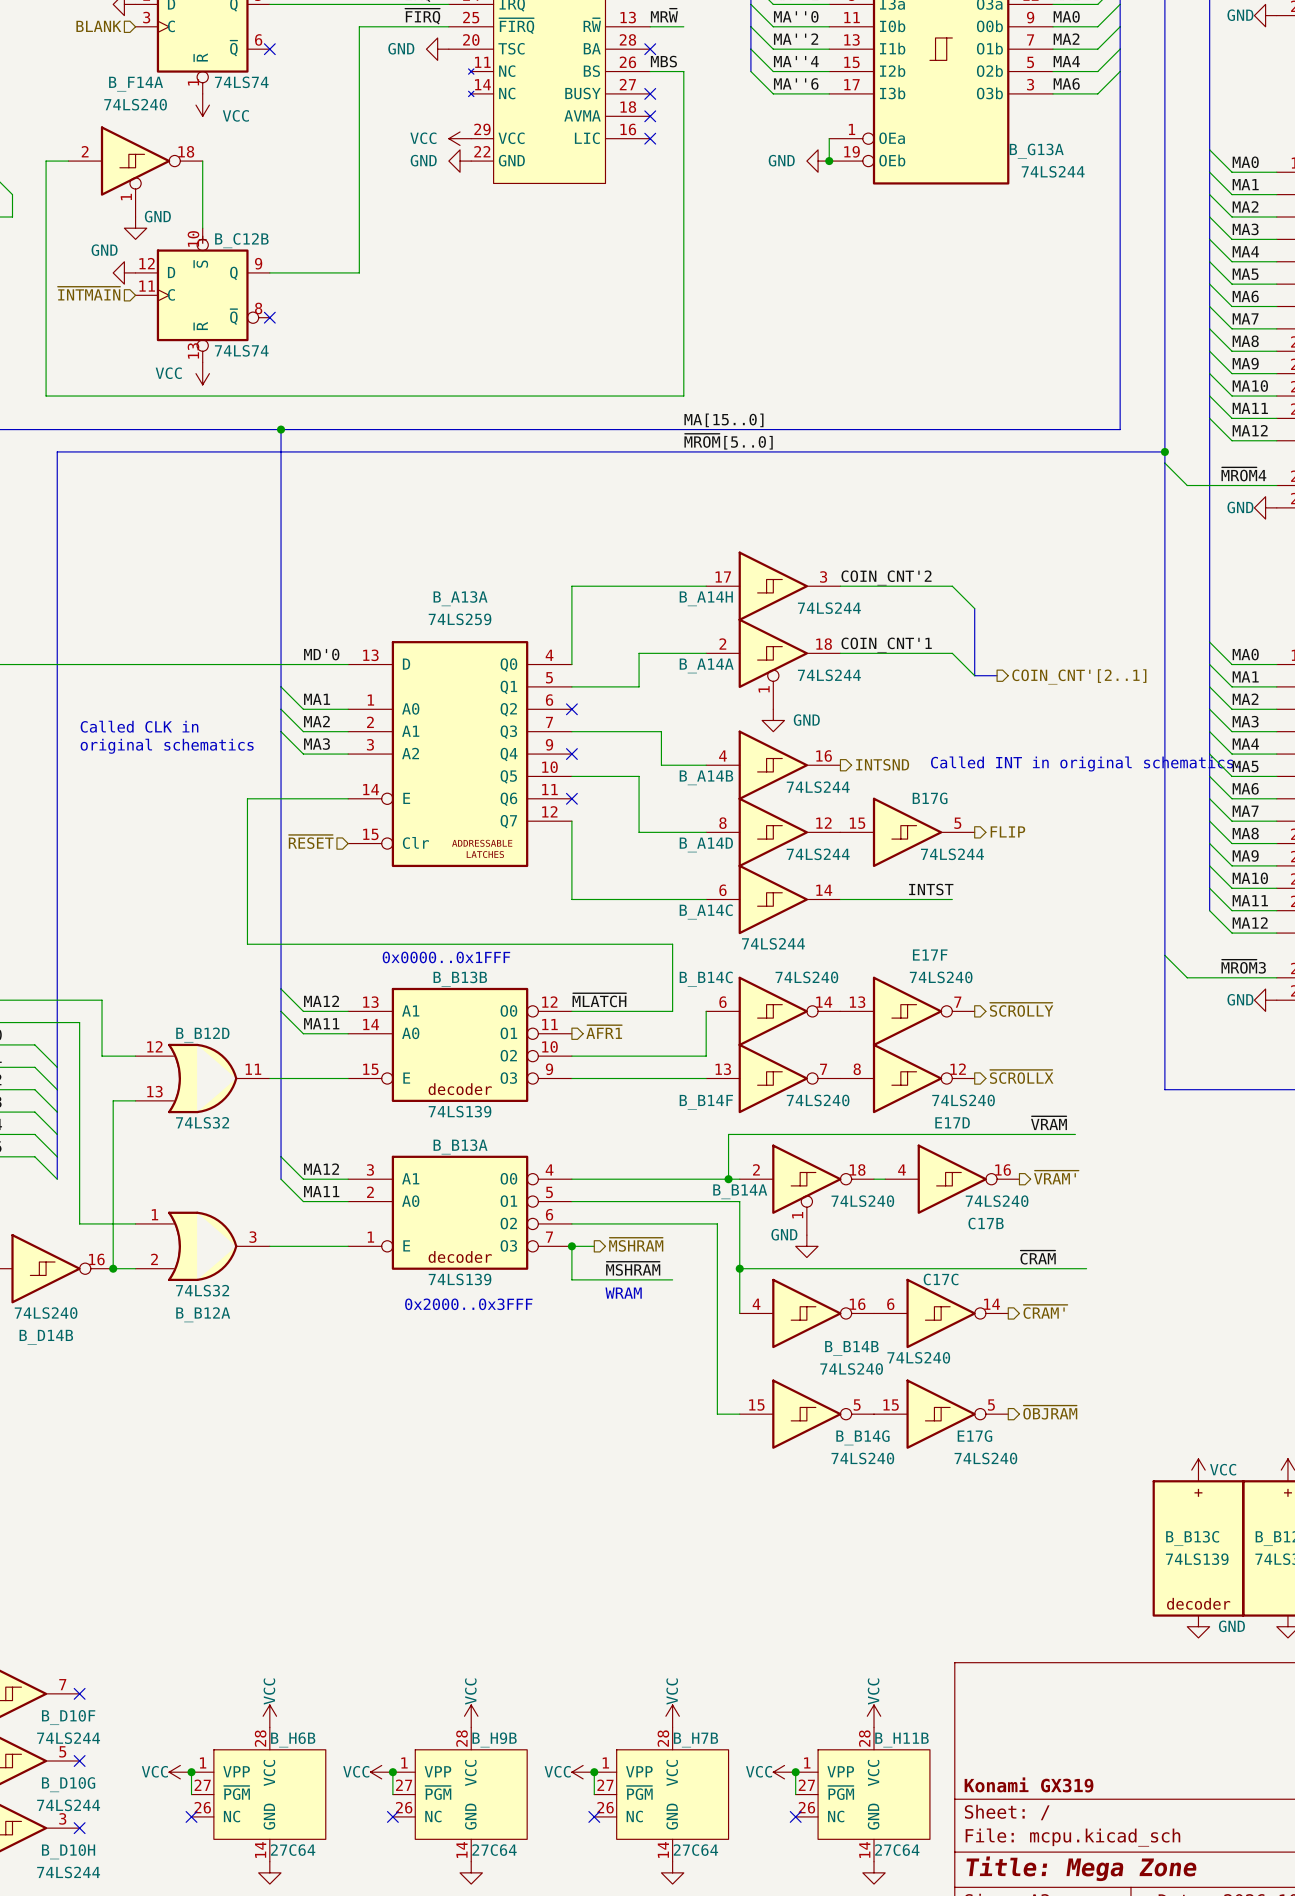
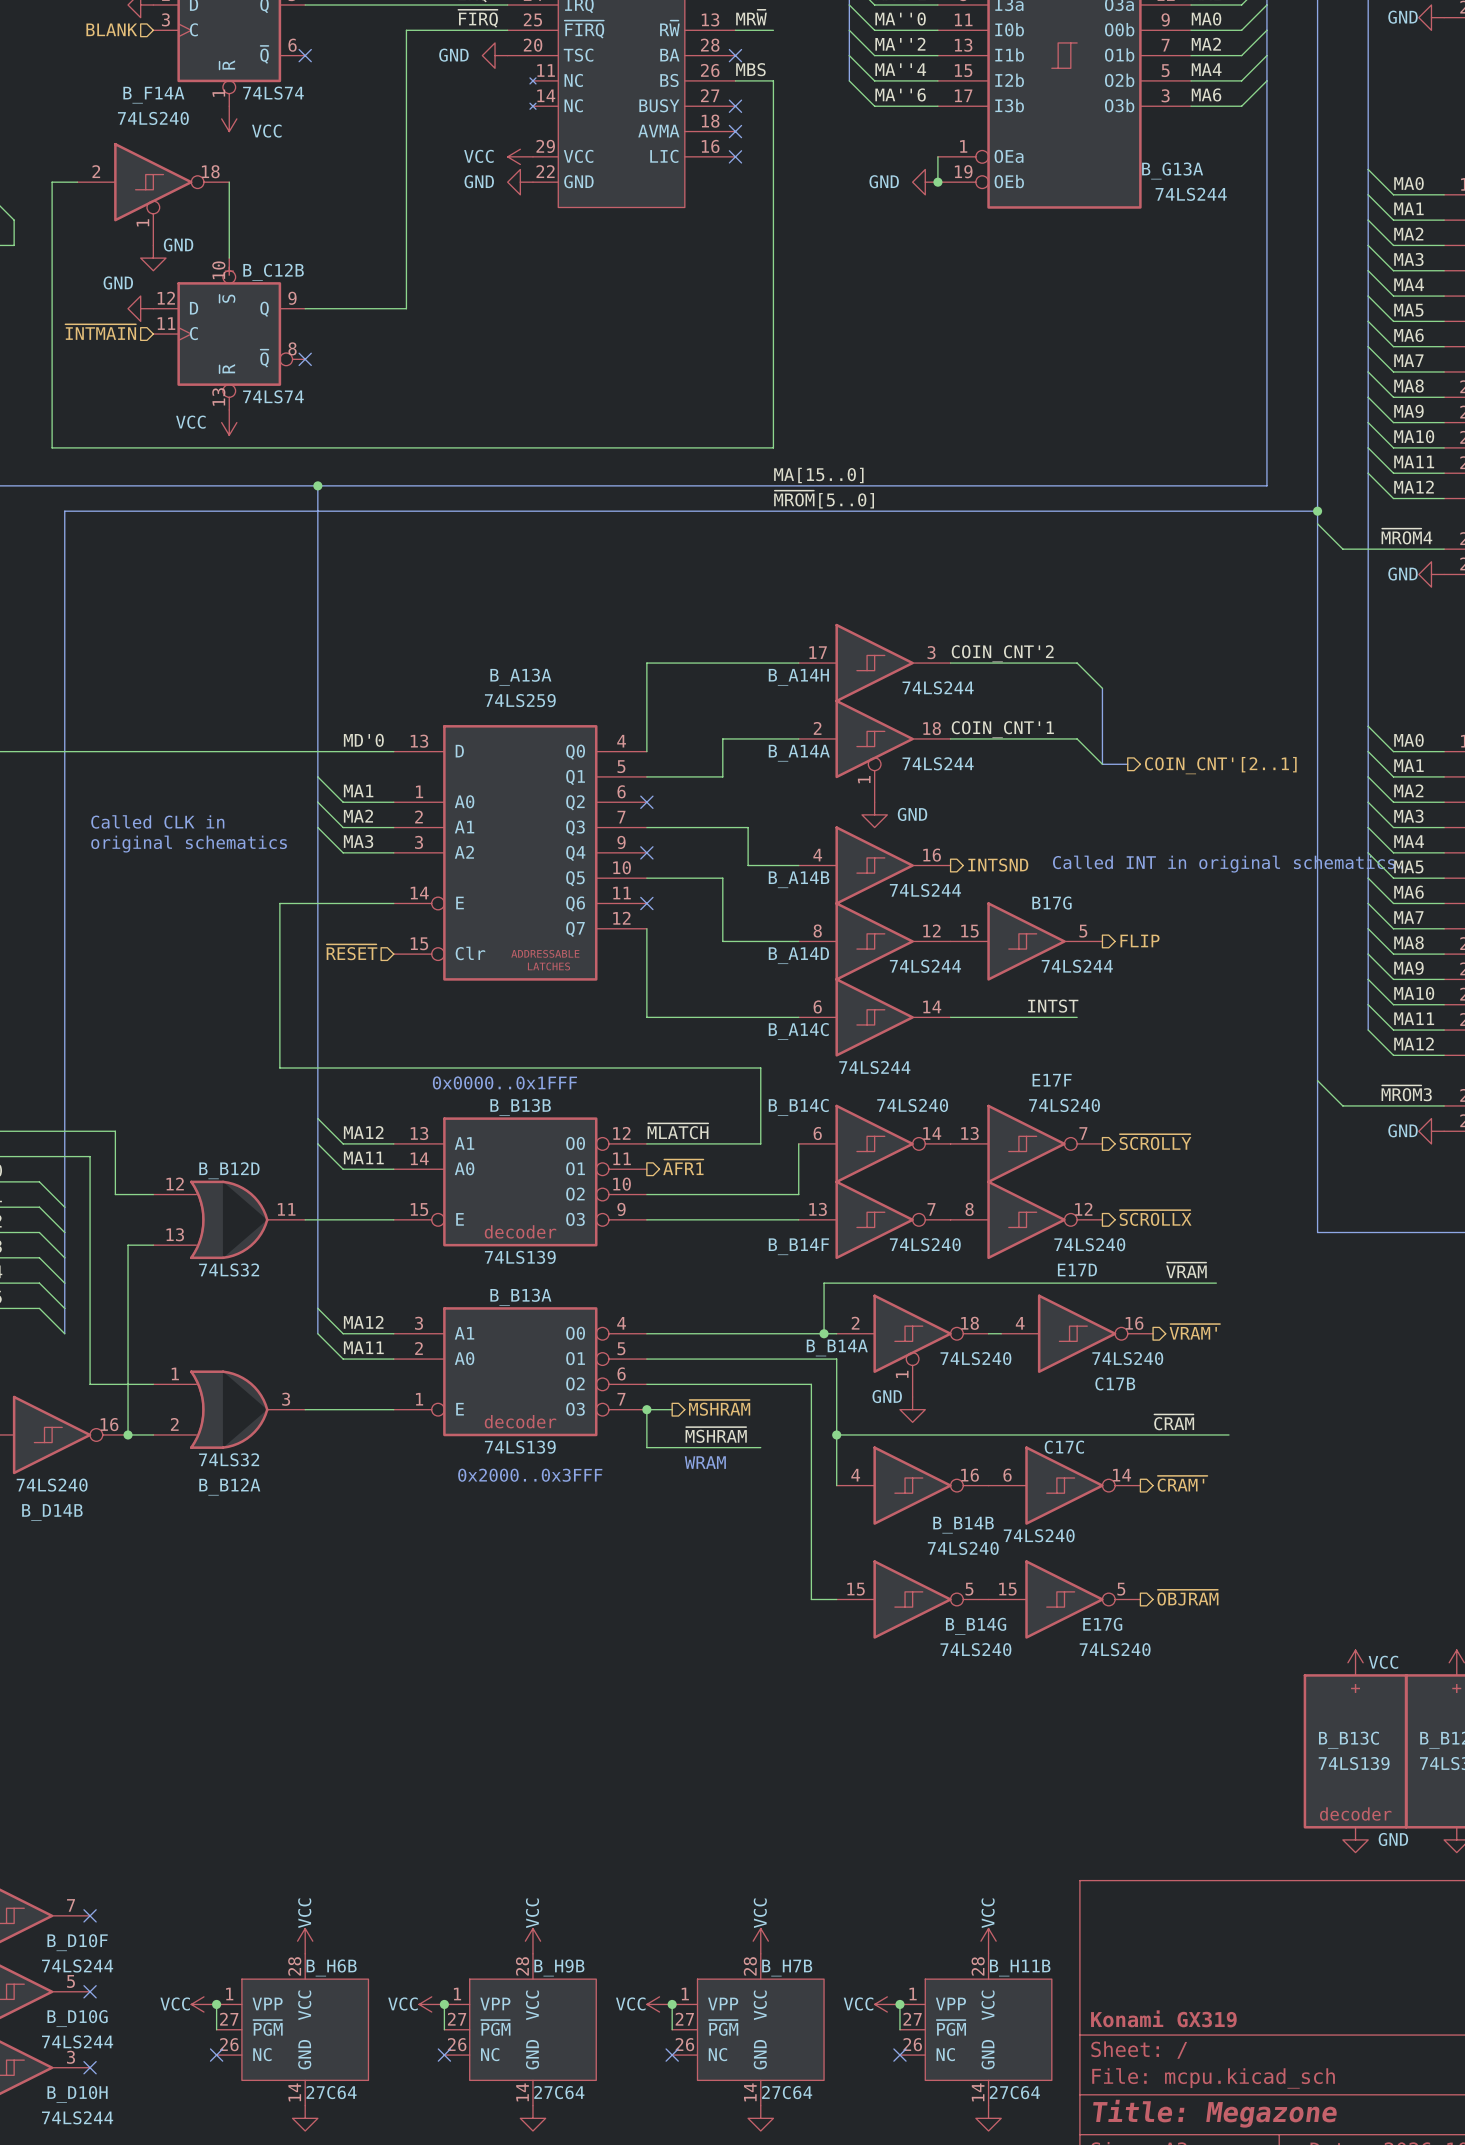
title block: Title: Mega Zone (1081, 1868) -> Title: Megazone (1215, 2113)

